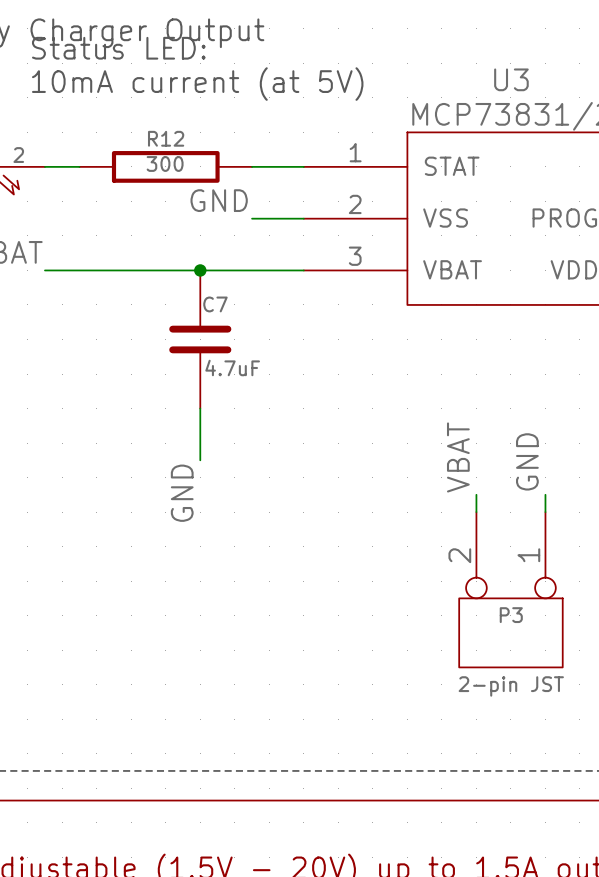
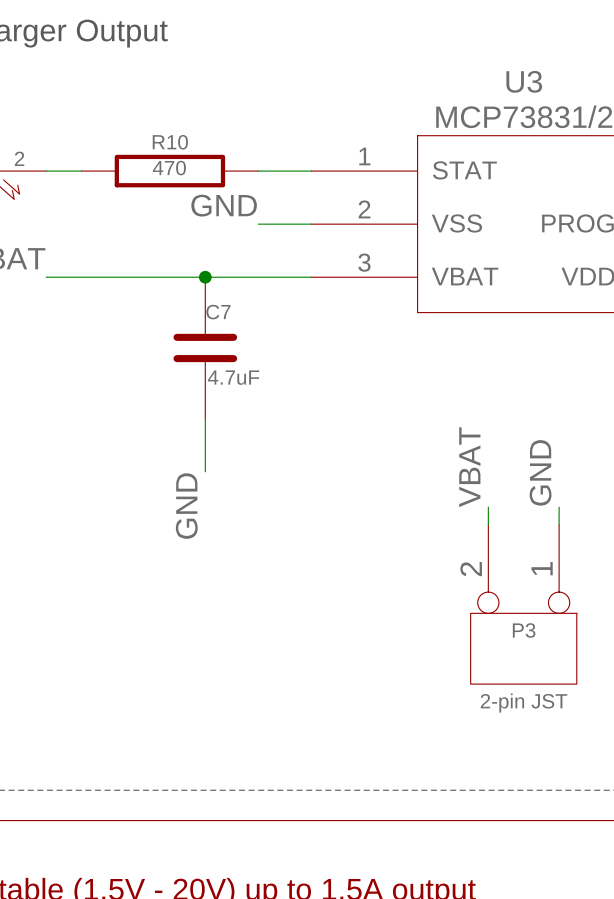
text: Status LED: (118, 48) -> none
text: 10mA current (at 5V) (197, 84) -> none
R12 name: R12 (166, 138) -> R10 (170, 142)
R12 value: 300 (165, 163) -> 470 (169, 168)

